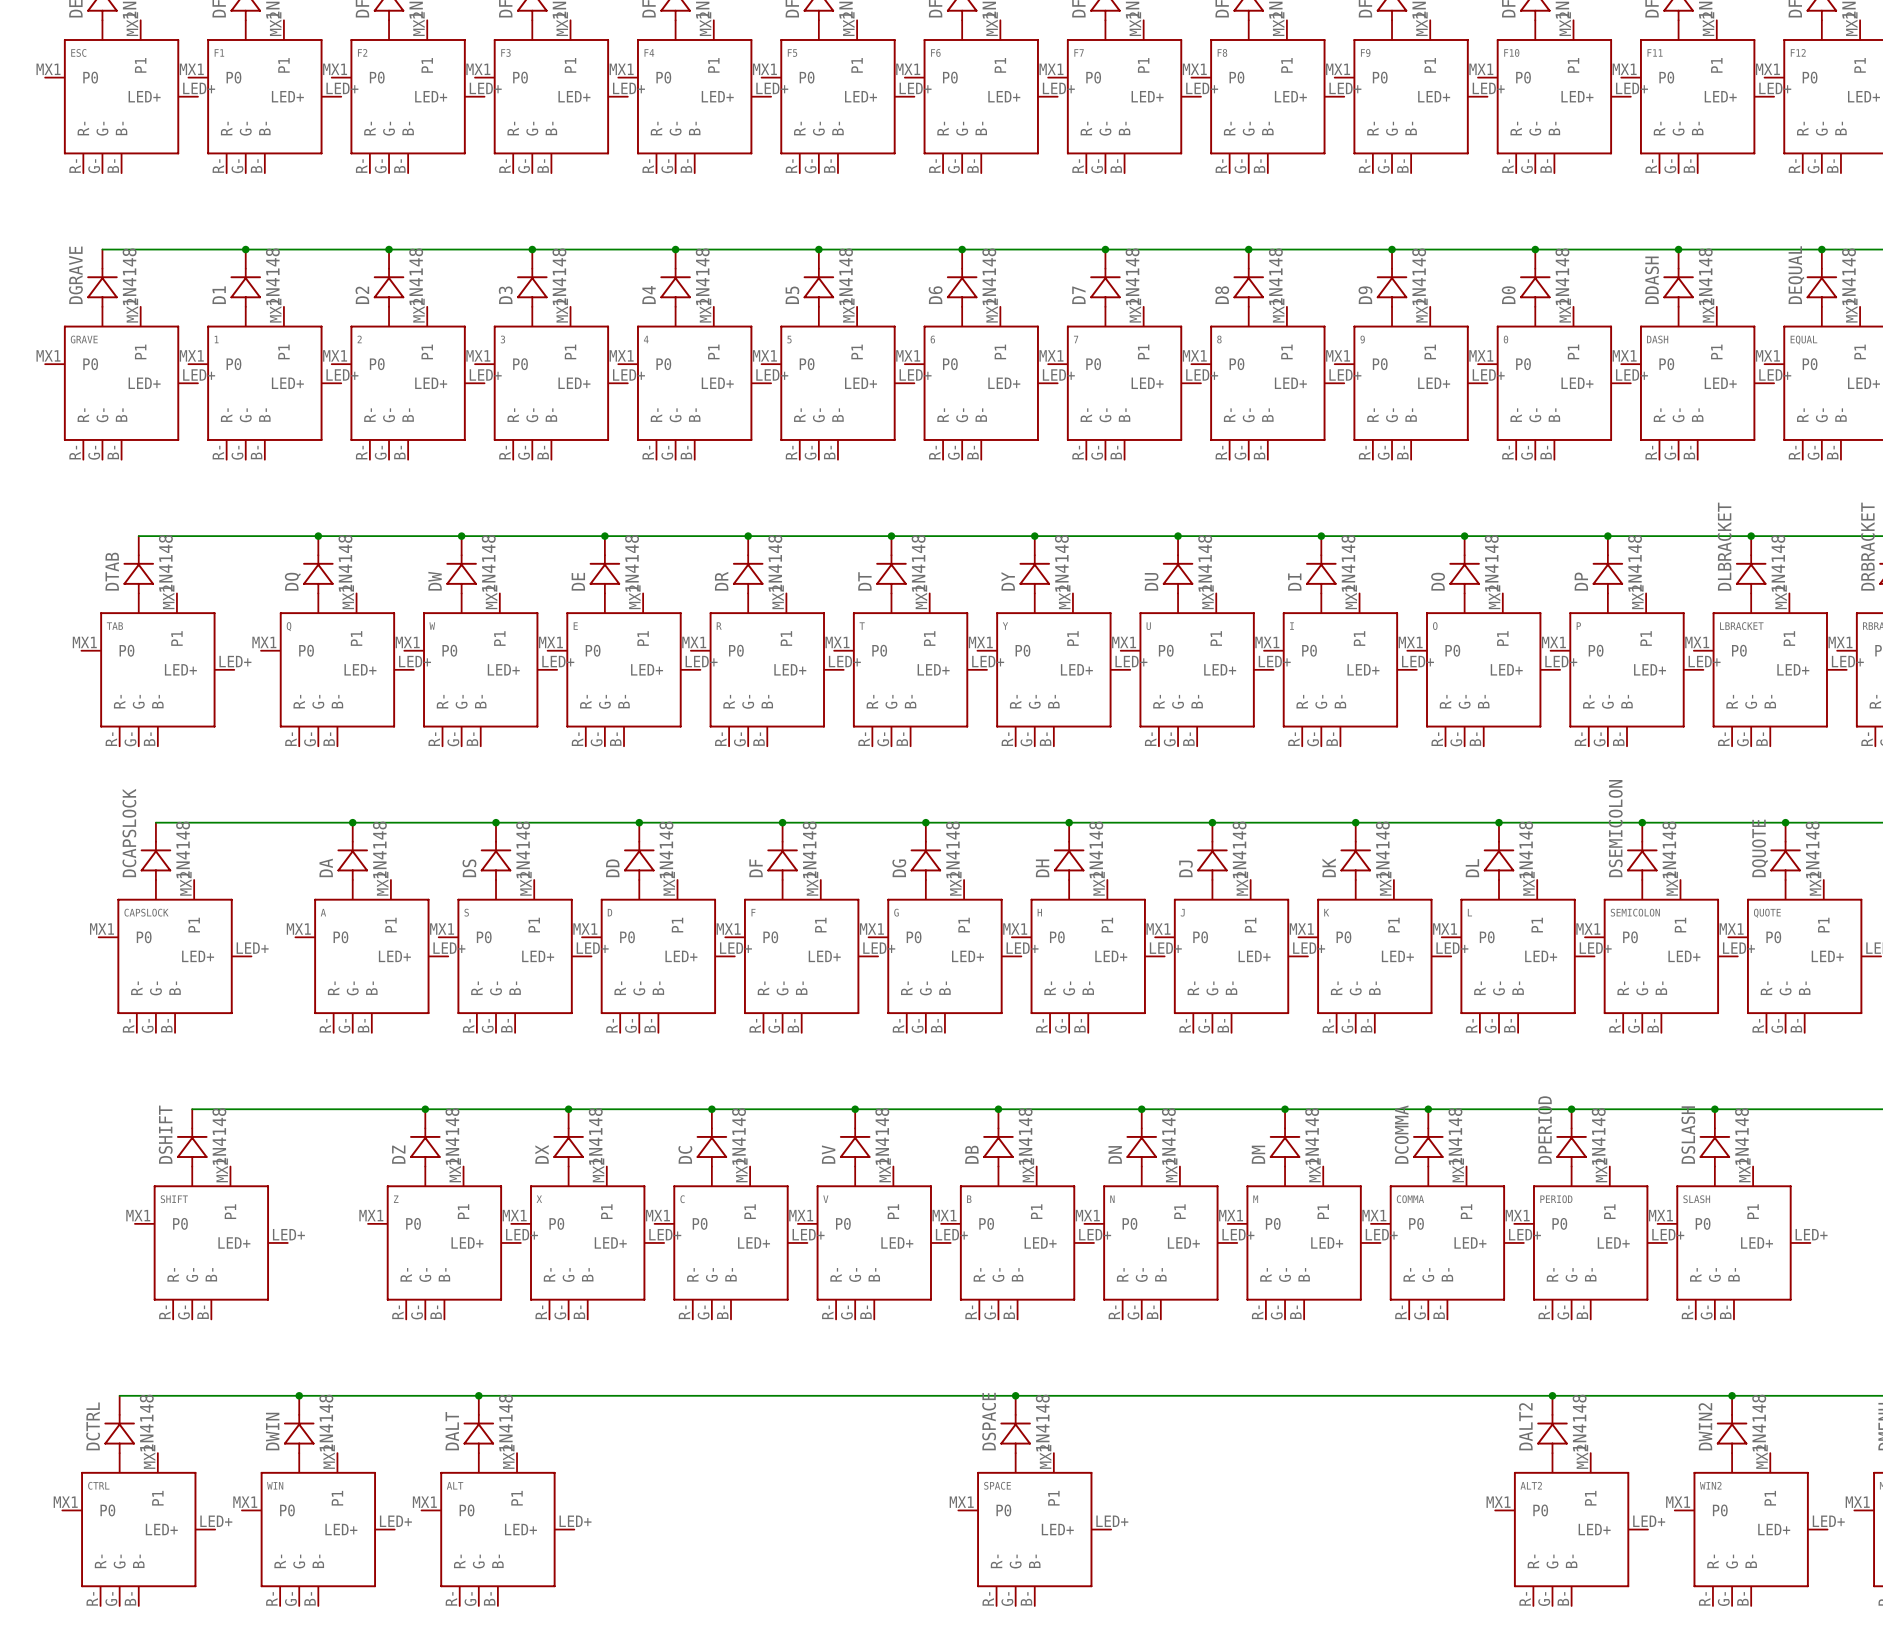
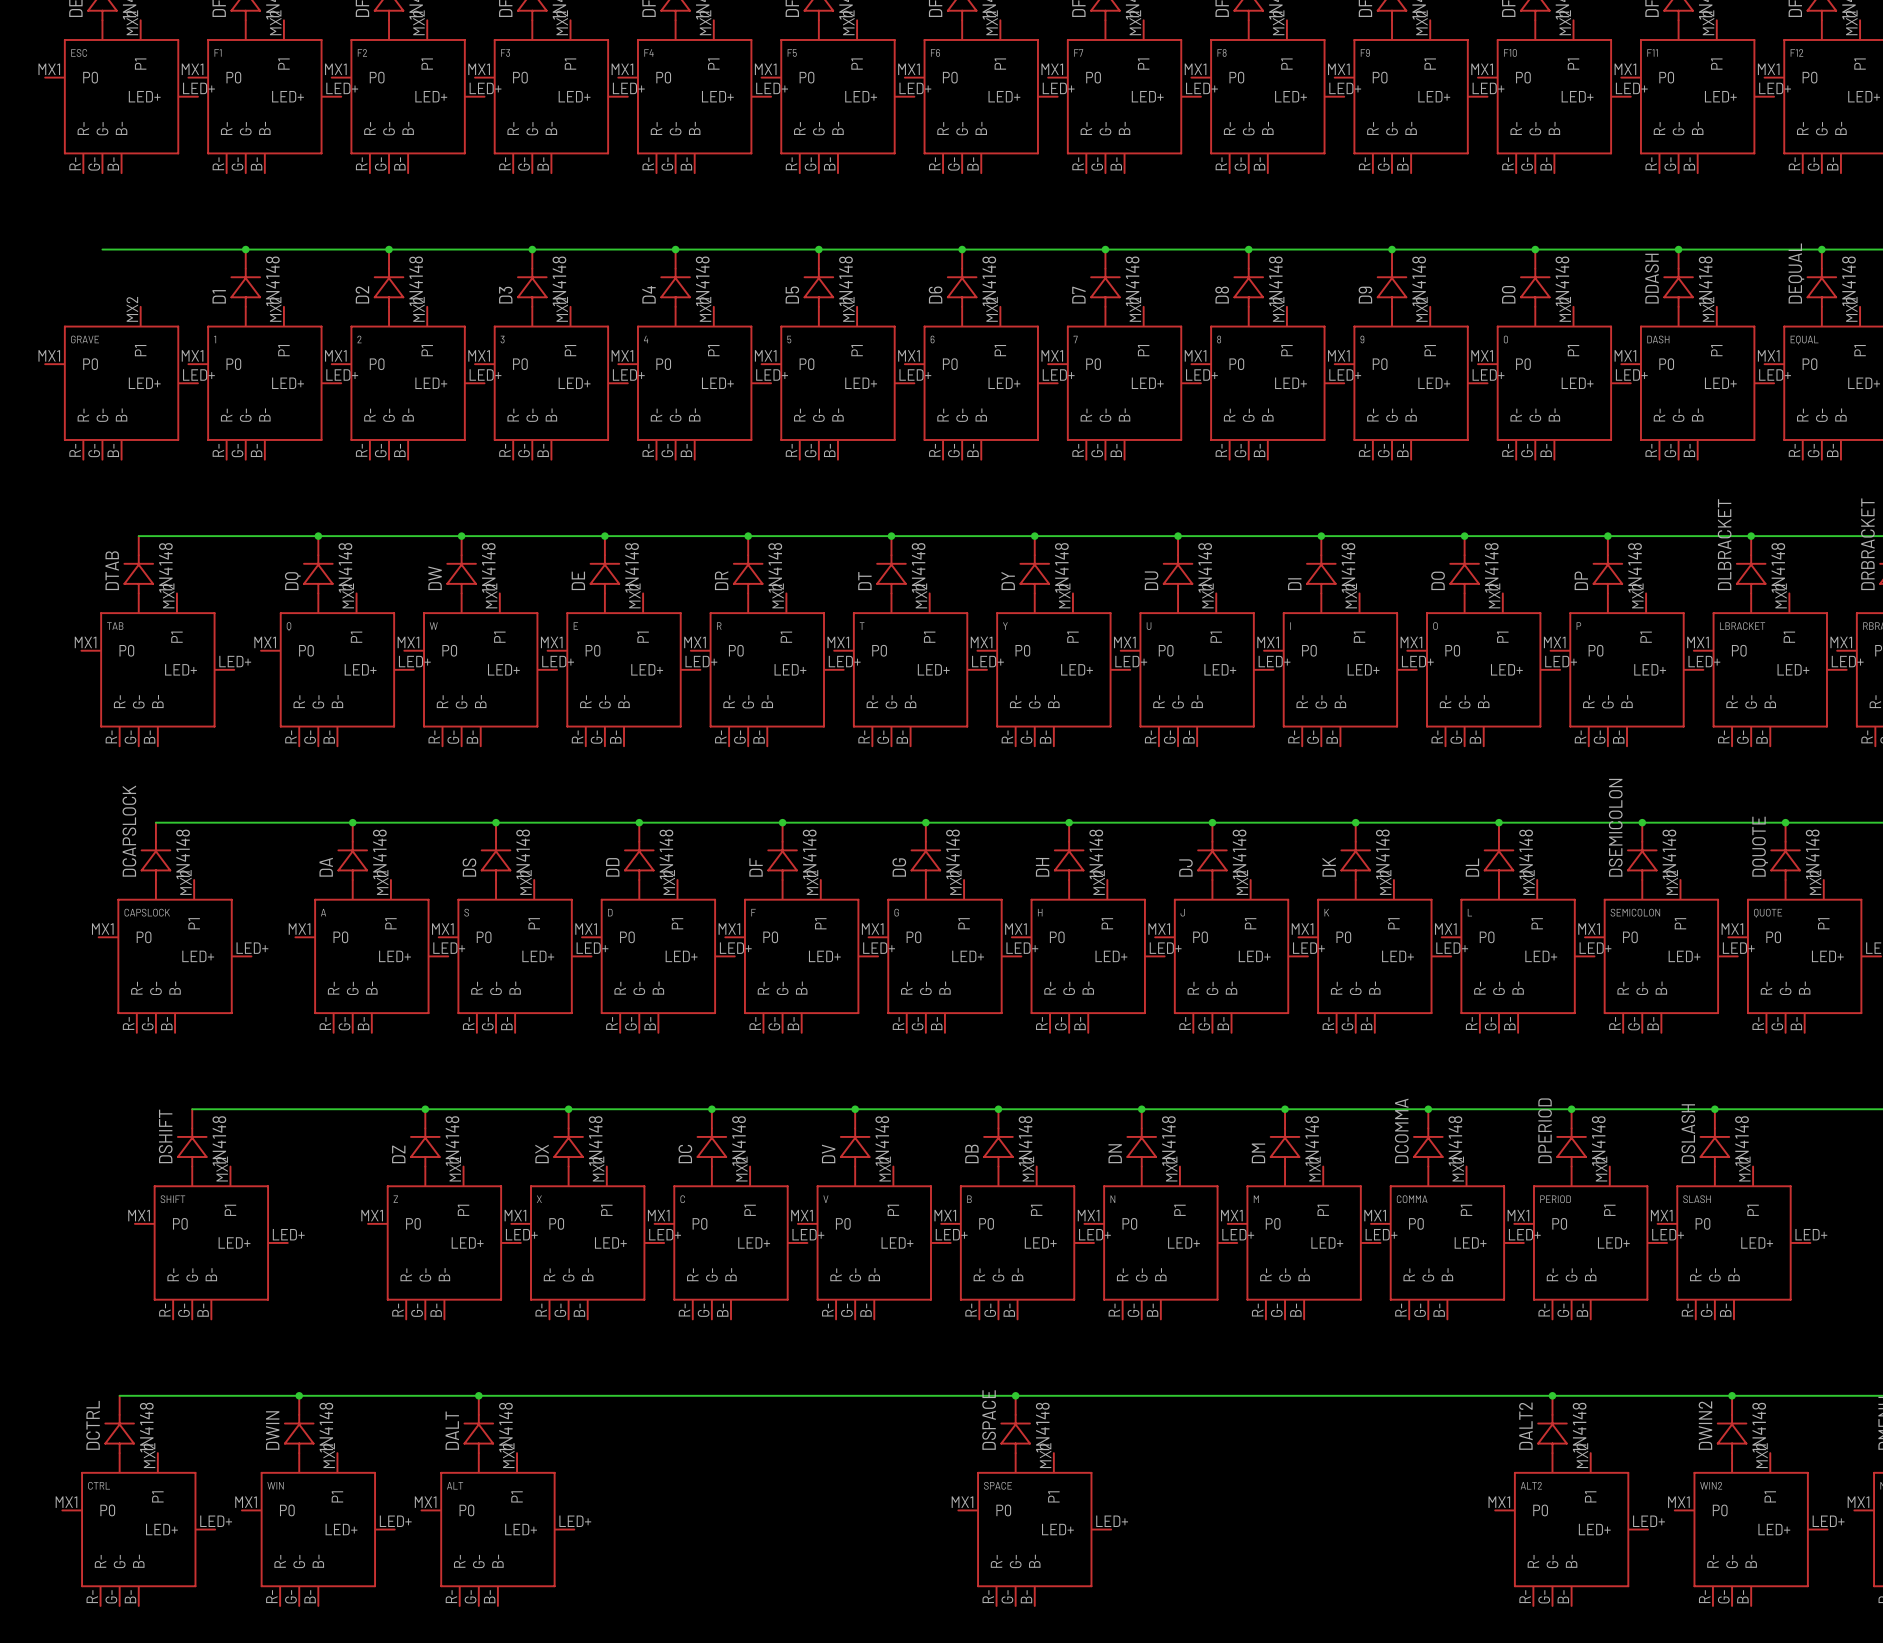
DGRAVE: 1N4148 (102, 287) -> none

